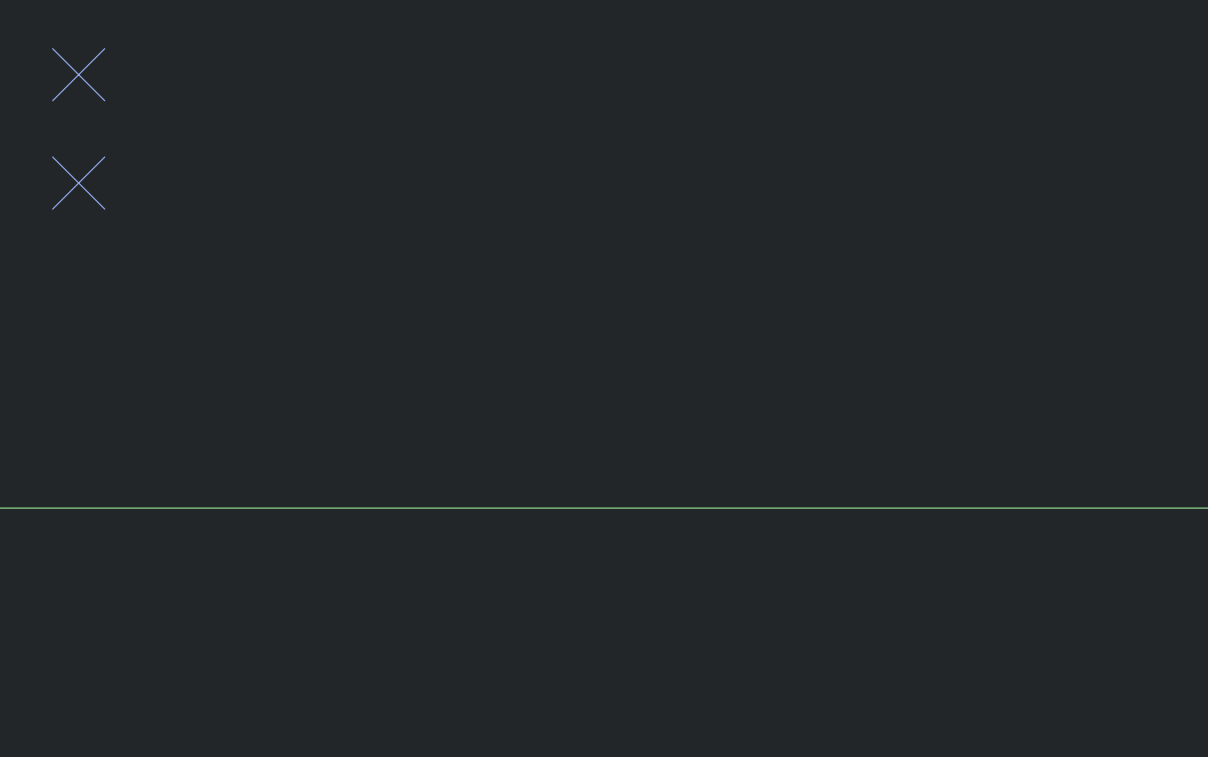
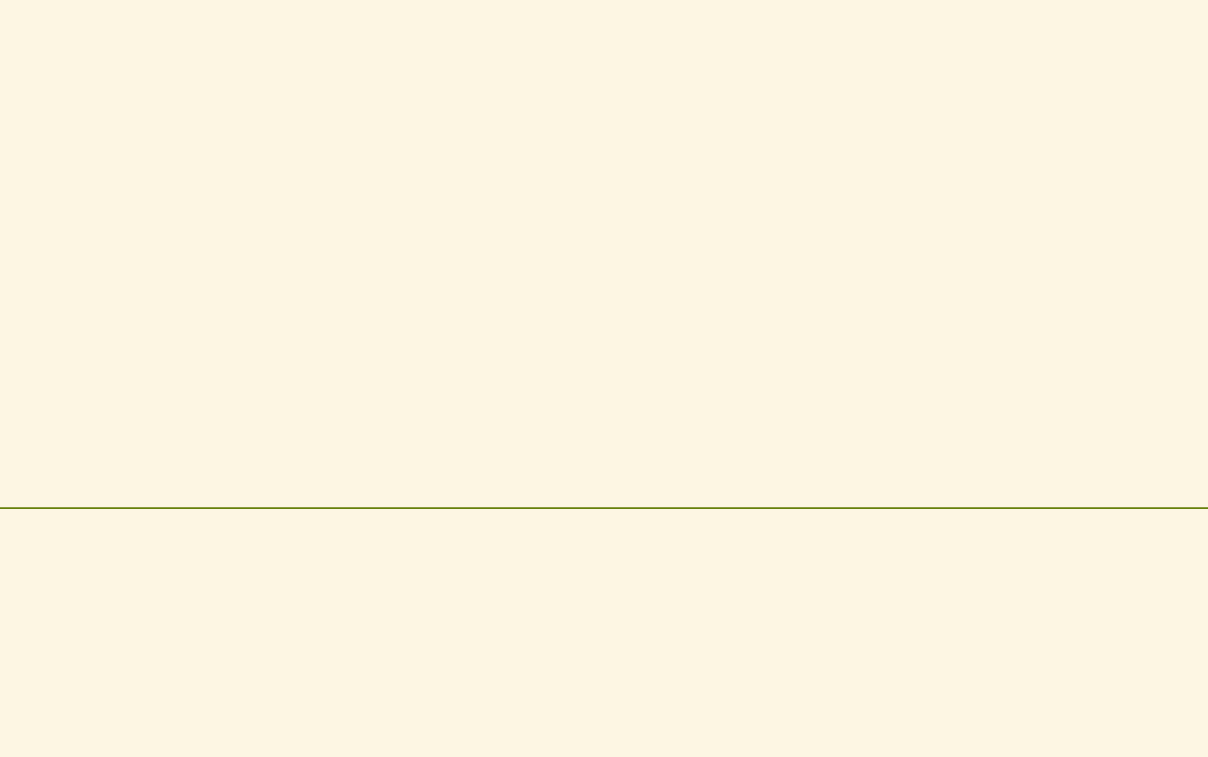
no-connect mark: (78, 74) -> none
no-connect mark: (78, 183) -> none

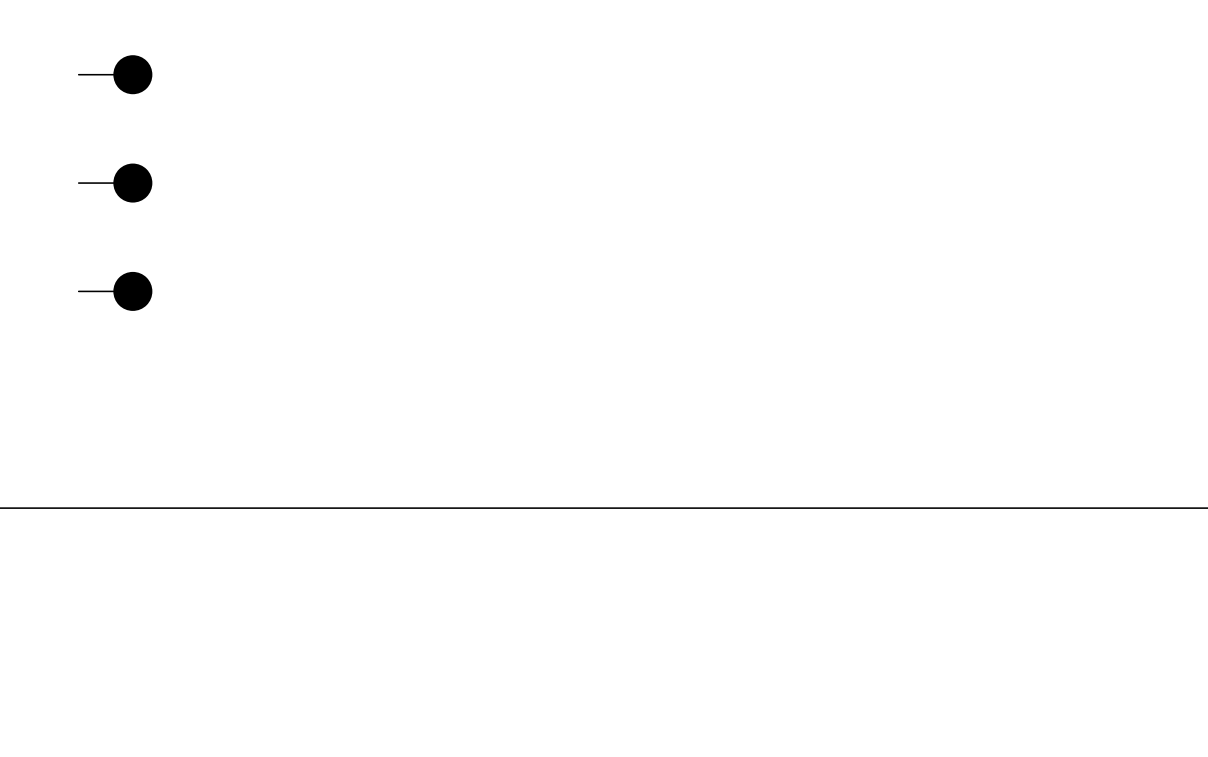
wire: none -> (78, 74) (132, 74)
junction: none -> (132, 74)
wire: none -> (78, 183) (132, 183)
junction: none -> (132, 183)
wire: none -> (78, 291) (132, 291)
junction: none -> (132, 291)

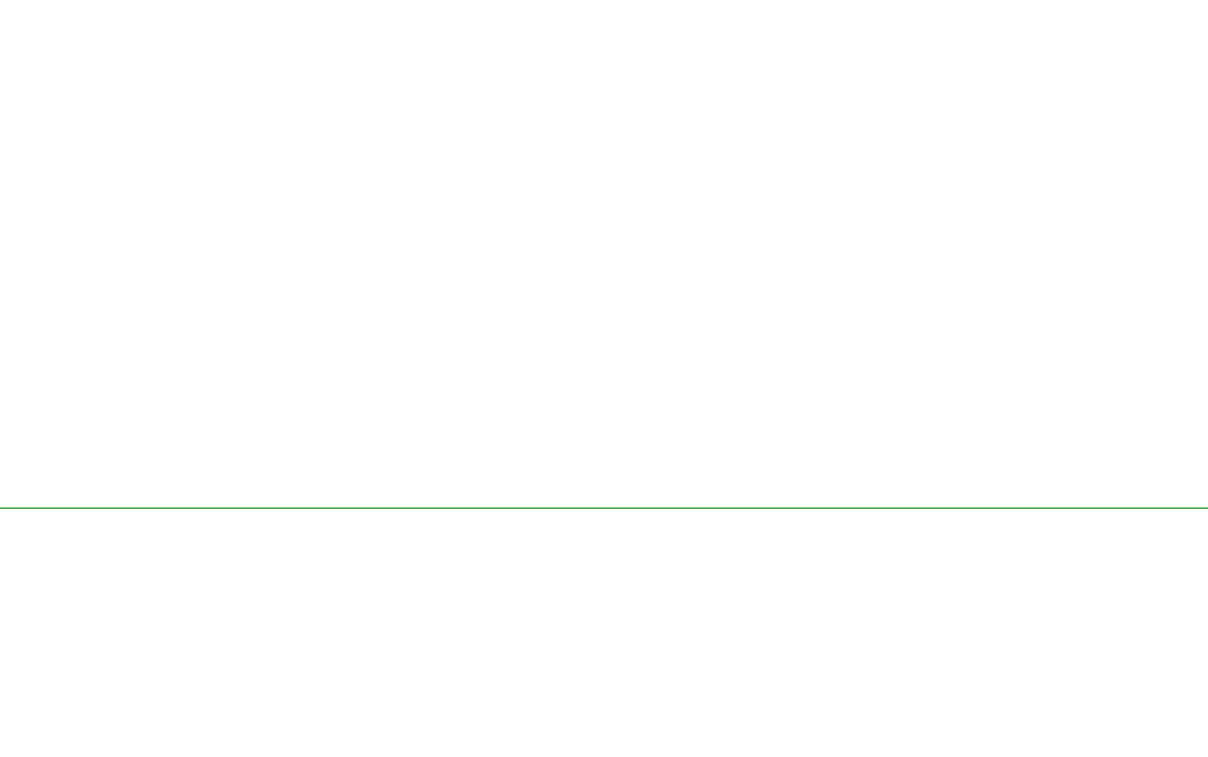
wire: (78, 74) (132, 74) -> none
junction: (132, 74) -> none
wire: (78, 183) (132, 183) -> none
junction: (132, 183) -> none
wire: (78, 291) (132, 291) -> none
junction: (132, 291) -> none

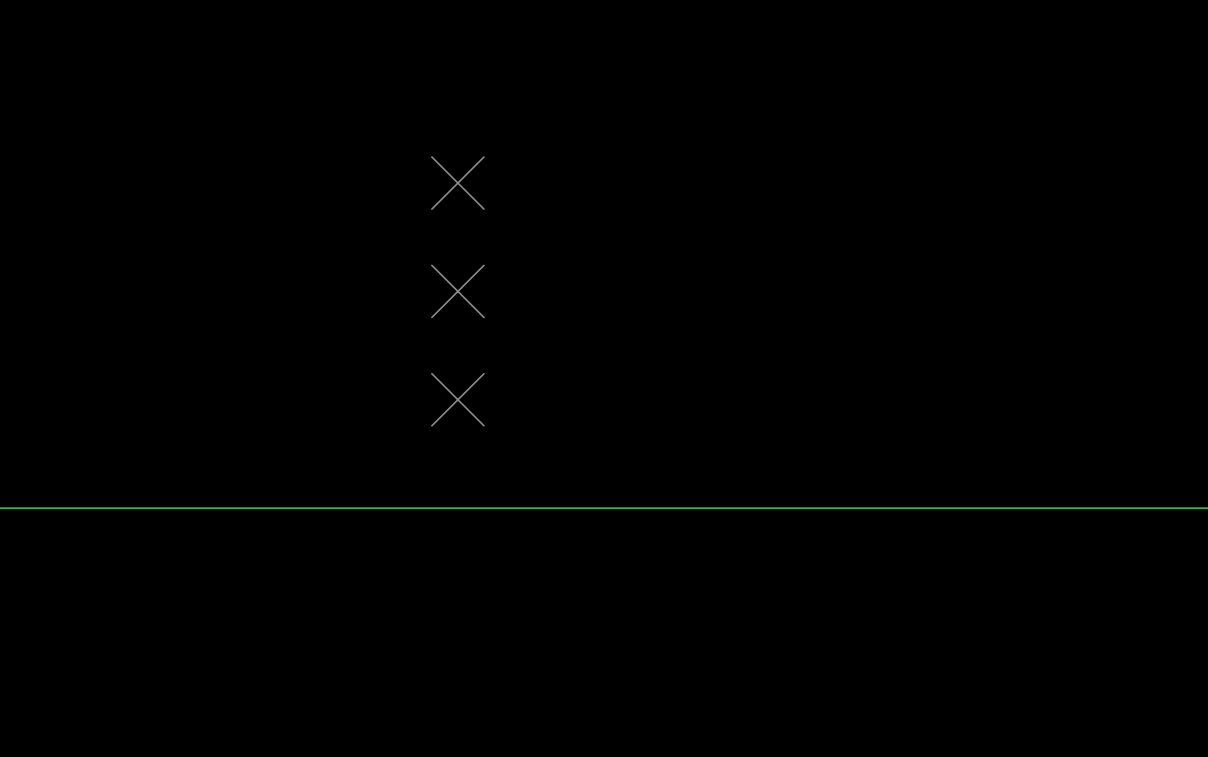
no-connect mark: none -> (457, 183)
no-connect mark: none -> (457, 291)
no-connect mark: none -> (457, 399)

